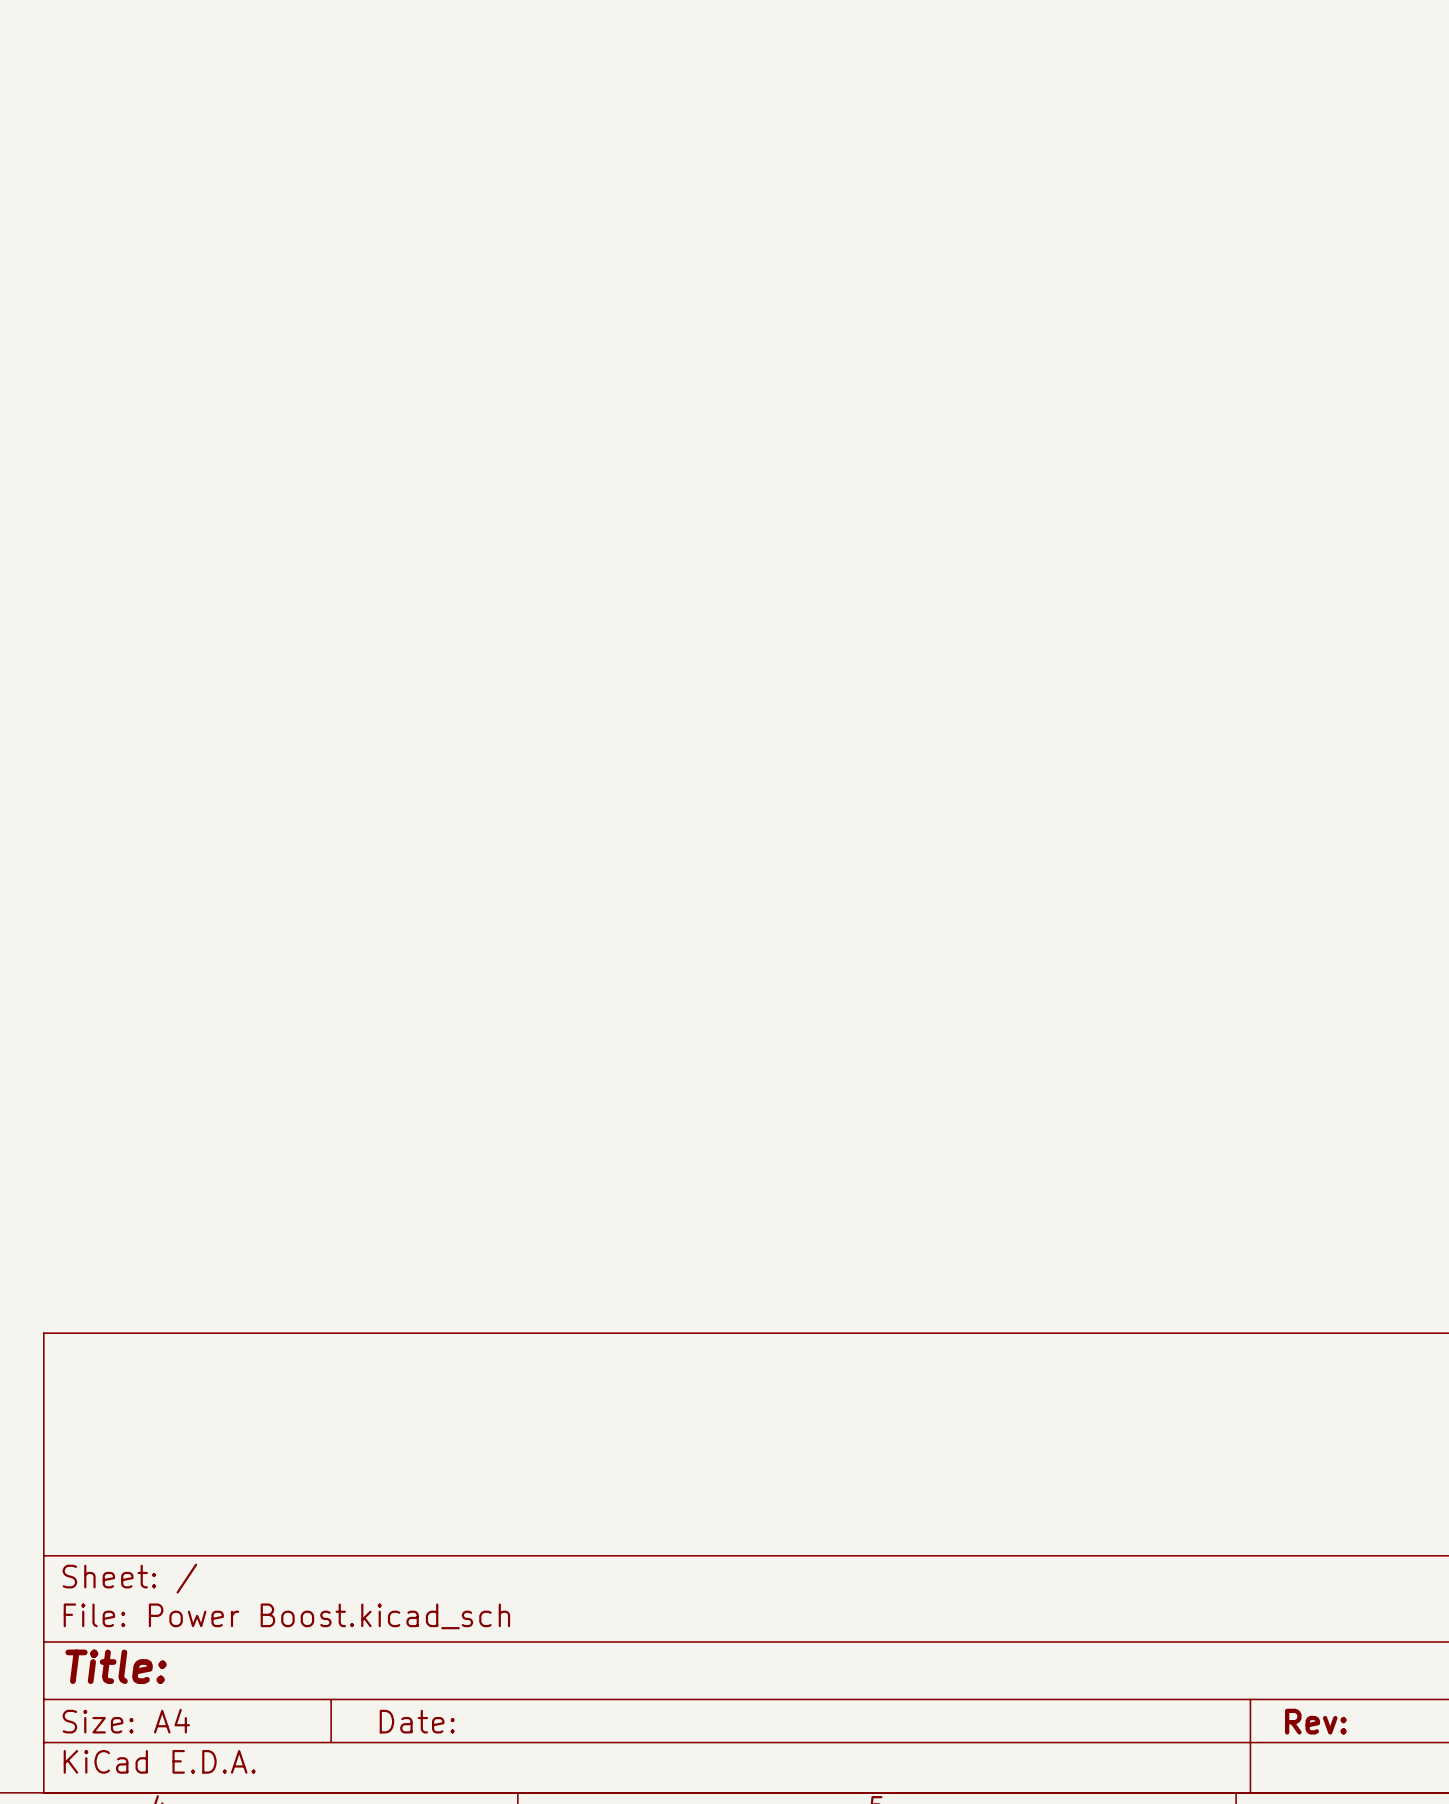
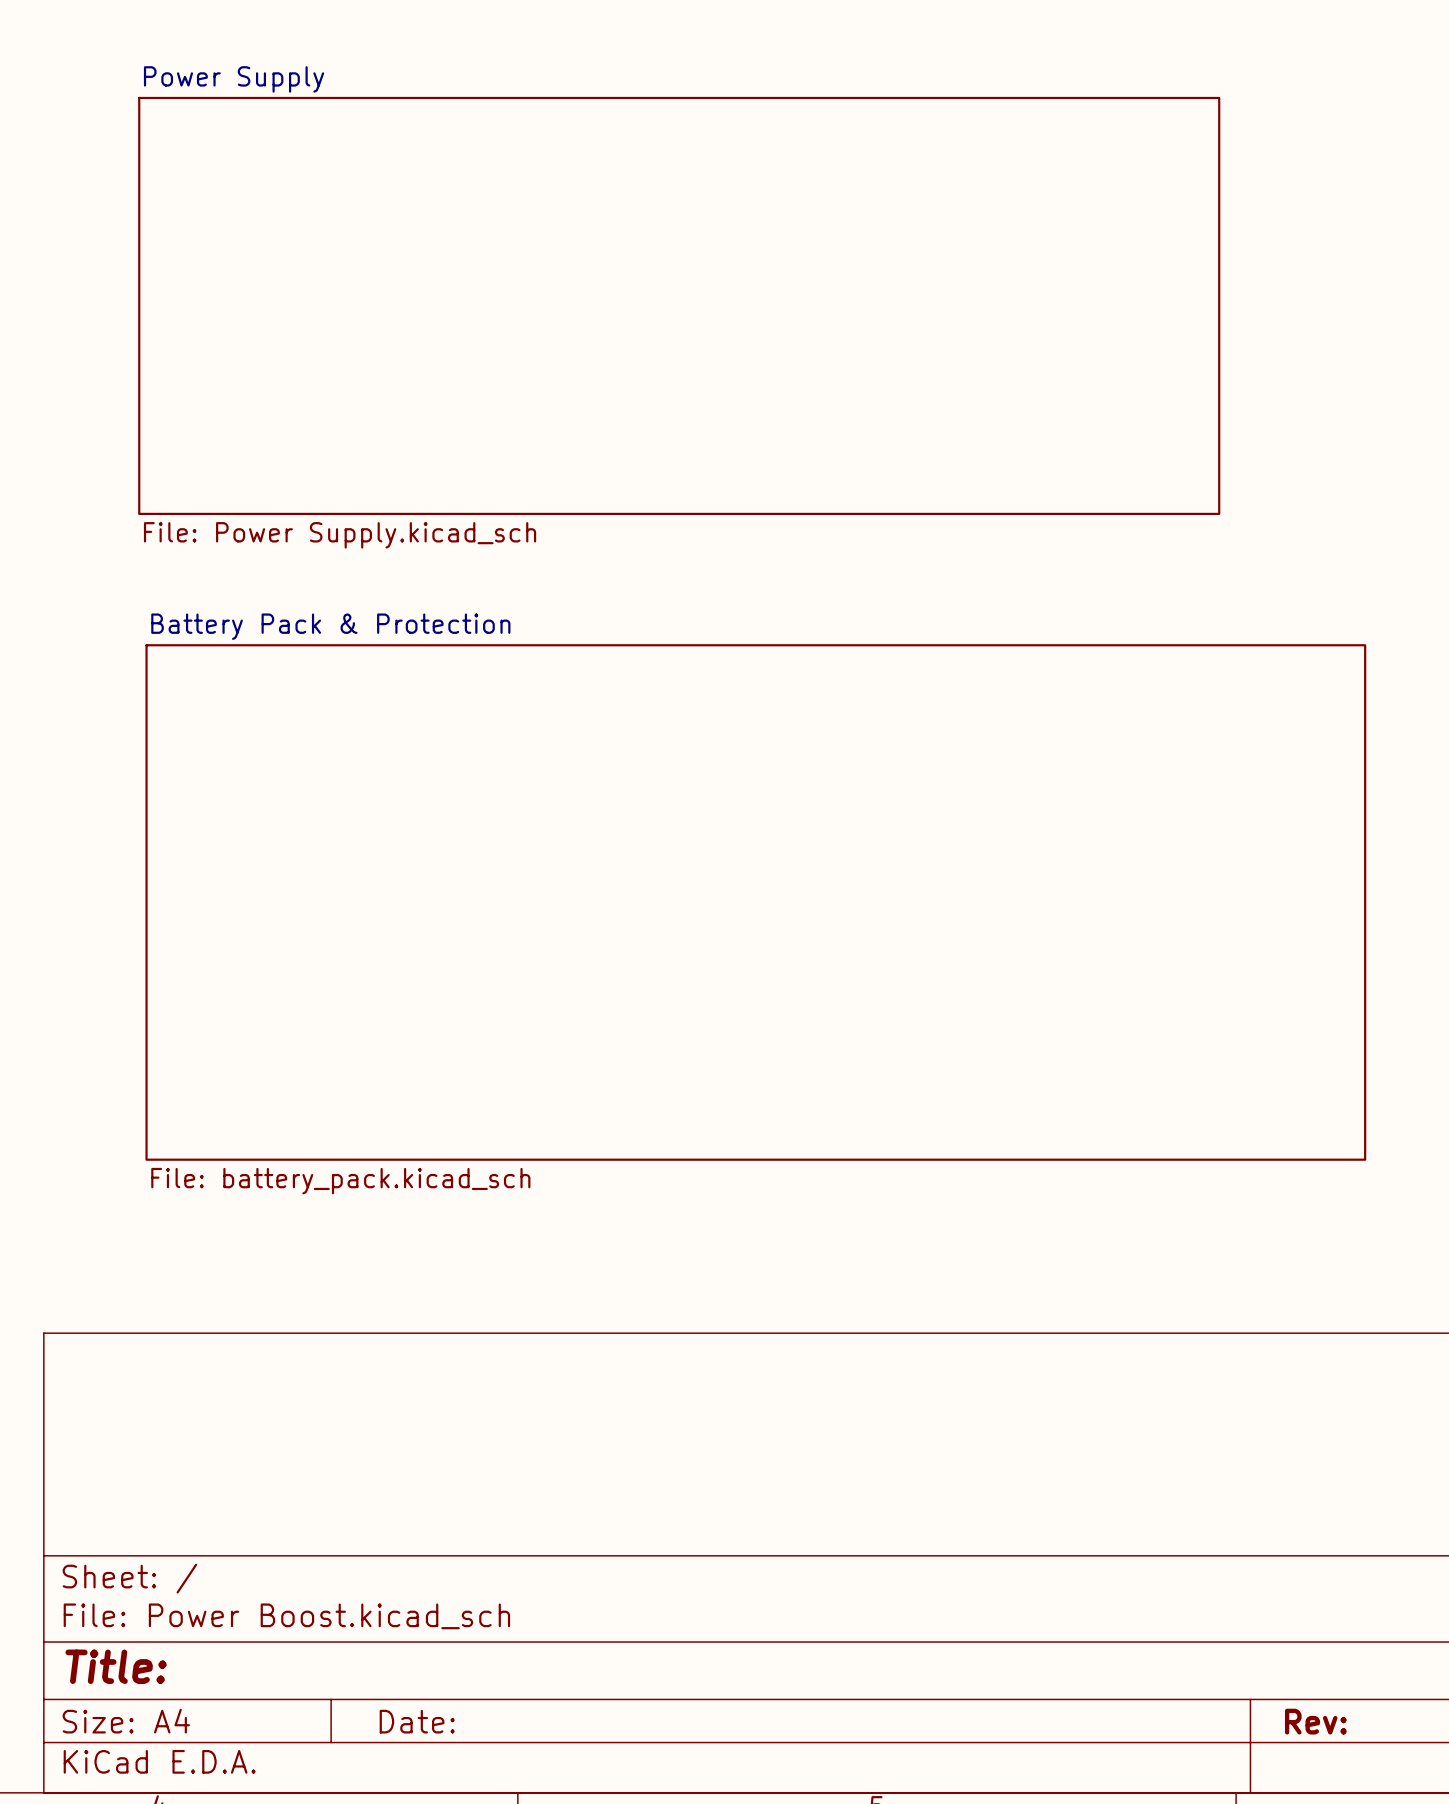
sheet Power Supply: none -> File: Power Supply.kicad_sch (679, 305)
sheet Battery Pack & Protection: none -> File: battery_pack.kicad_sch (755, 902)

